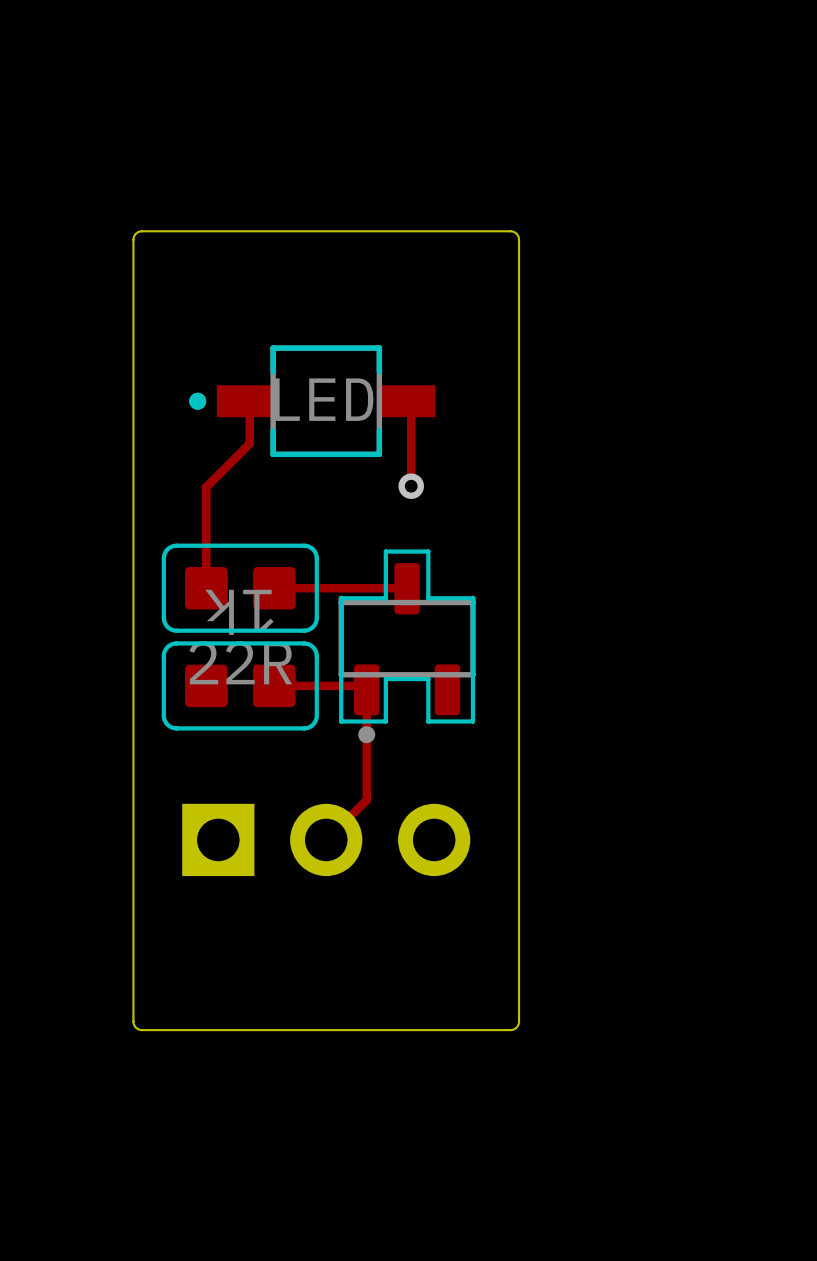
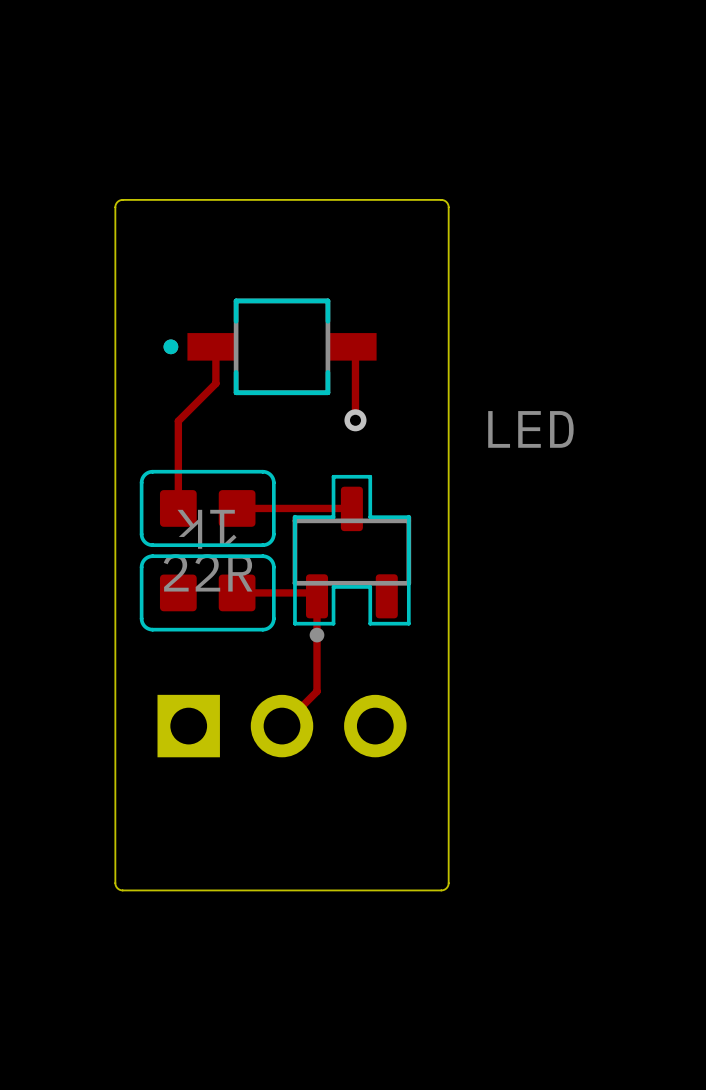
part value position: LED (323, 399) -> LED (530, 429)

